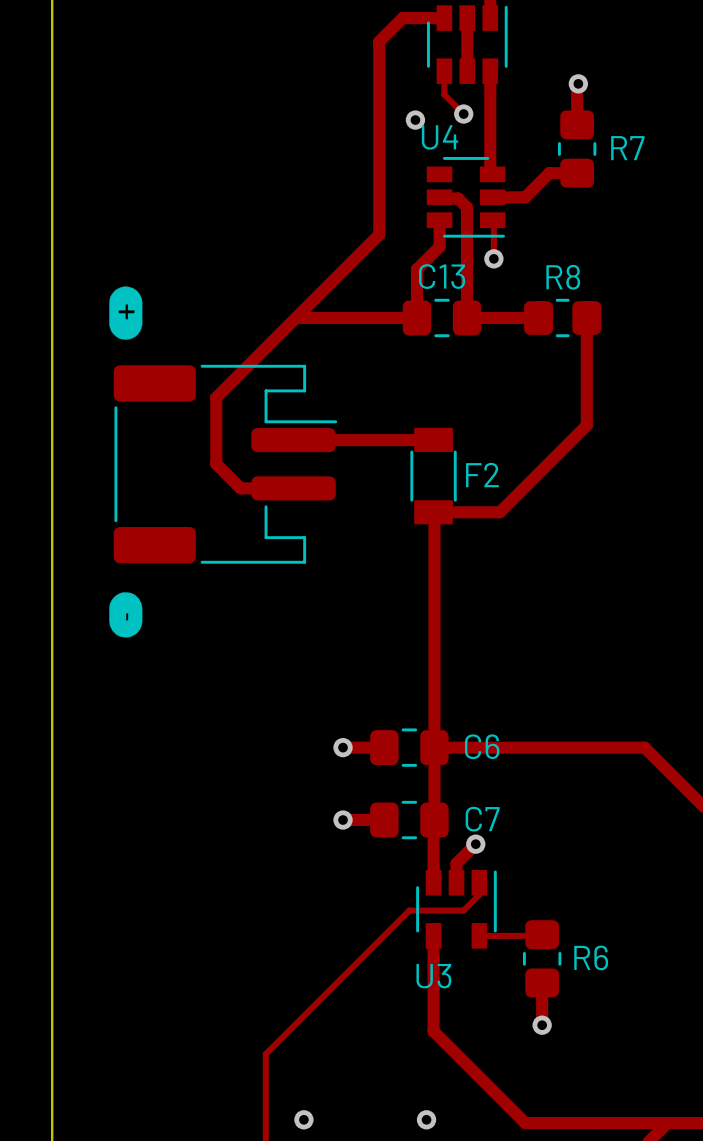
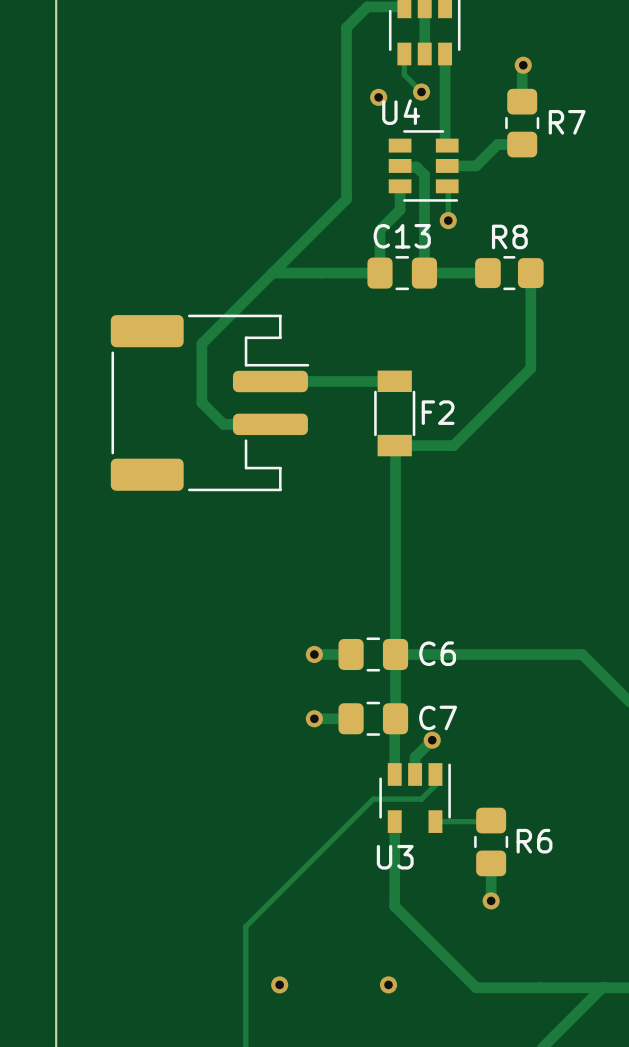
drawing: [109, 286, 143, 340] -> none
drawing: [109, 592, 143, 638] -> none

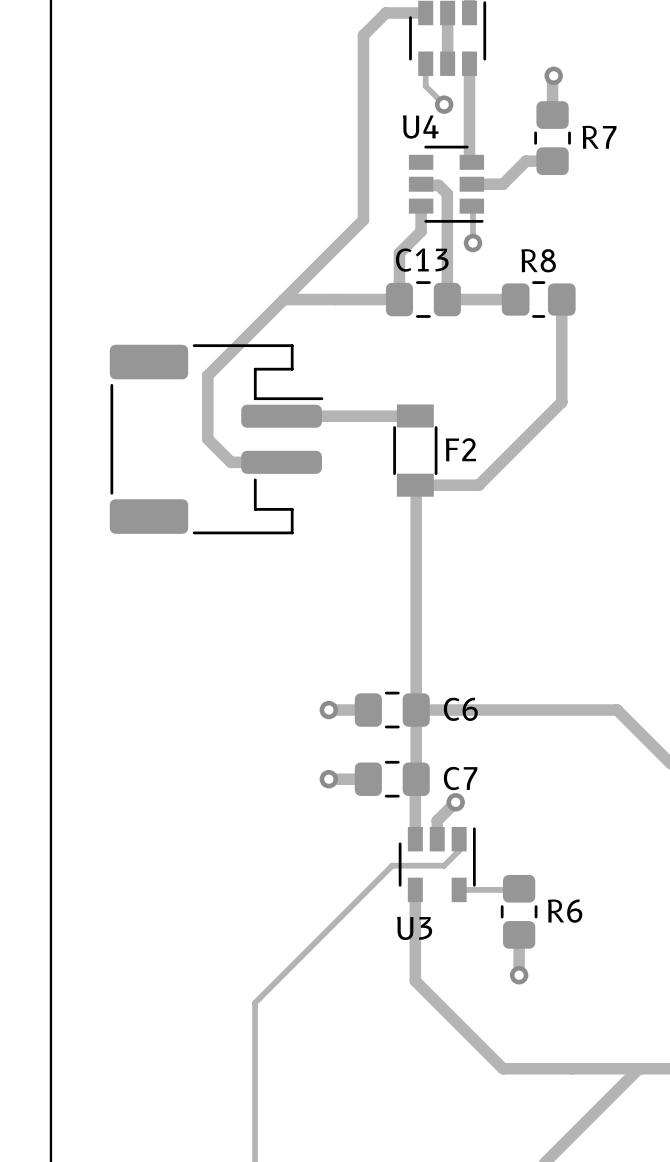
via: (378, 97) -> none
via: (279, 984) -> none
via: (388, 984) -> none

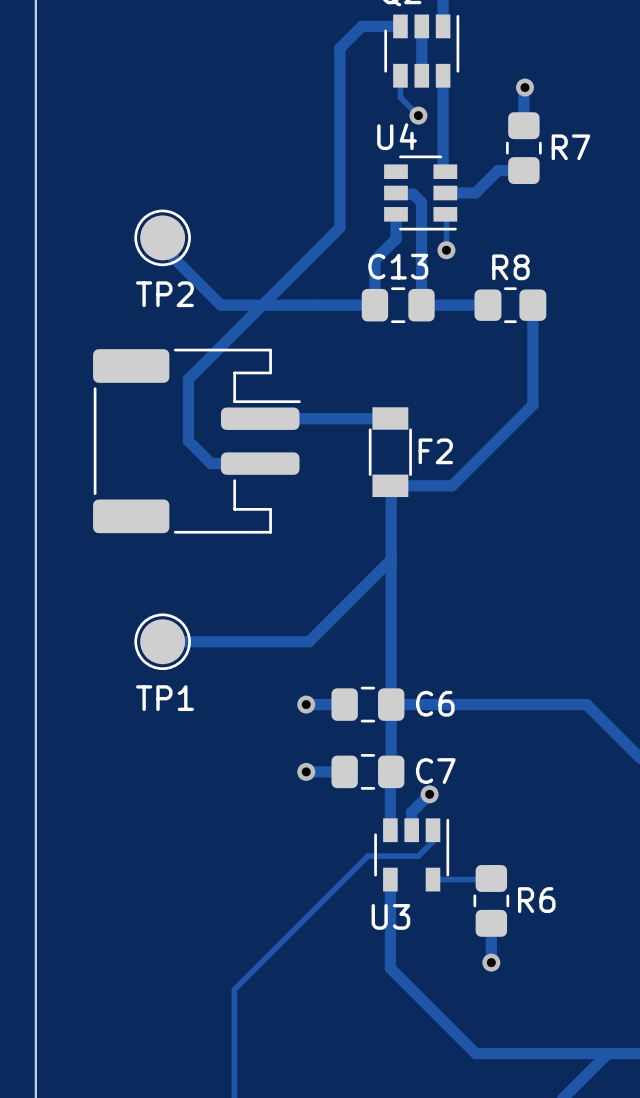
track: none -> (162, 237) (162, 246) (220, 305) (262, 305)
TP2: none -> (162, 237)
track: none -> (391, 559) (309, 641) (162, 641)
TP1: none -> (162, 641)

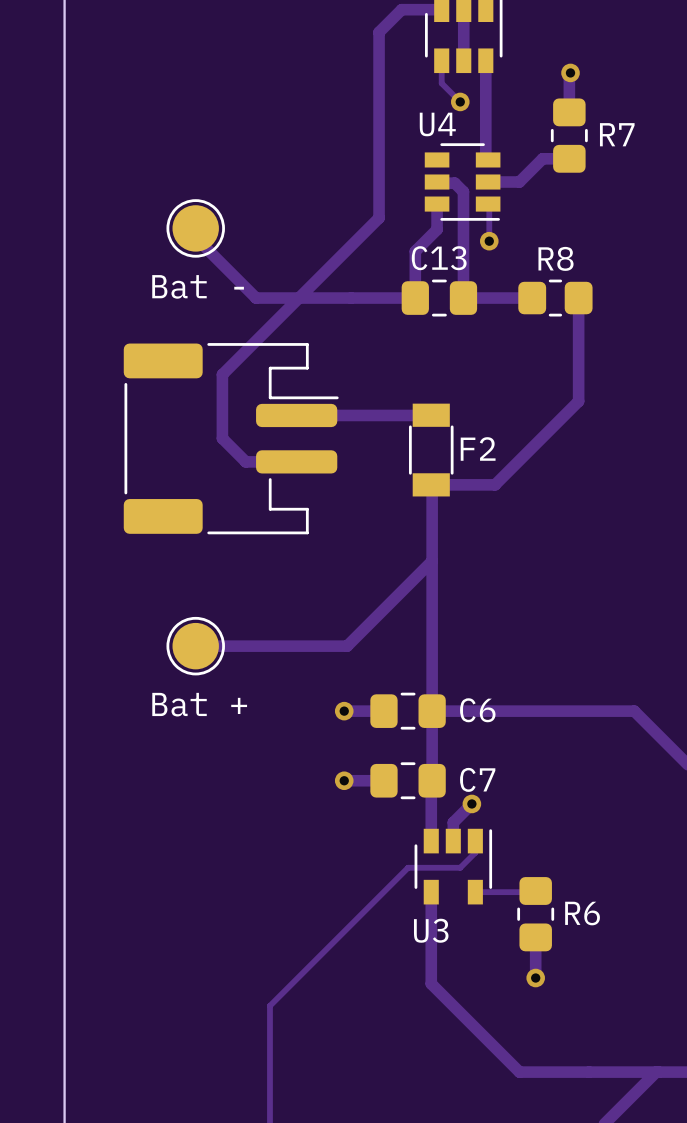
TP2 name: TP2 (164, 294) -> Bat - (198, 286)
TP1 name: TP1 (164, 698) -> Bat + (199, 704)

